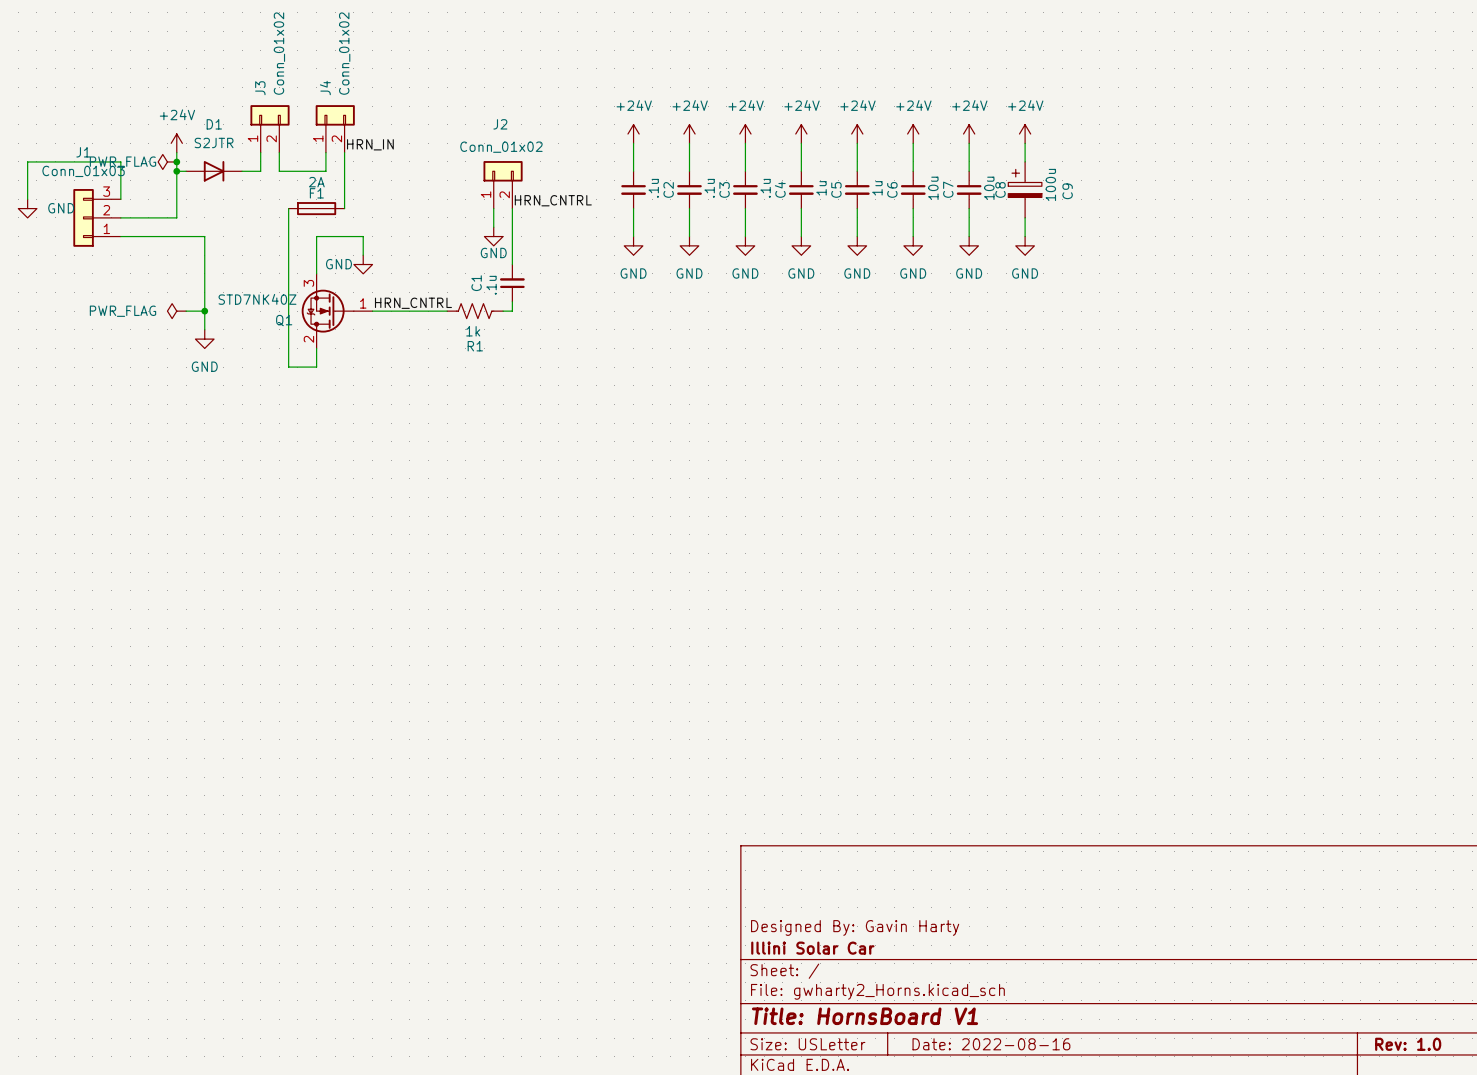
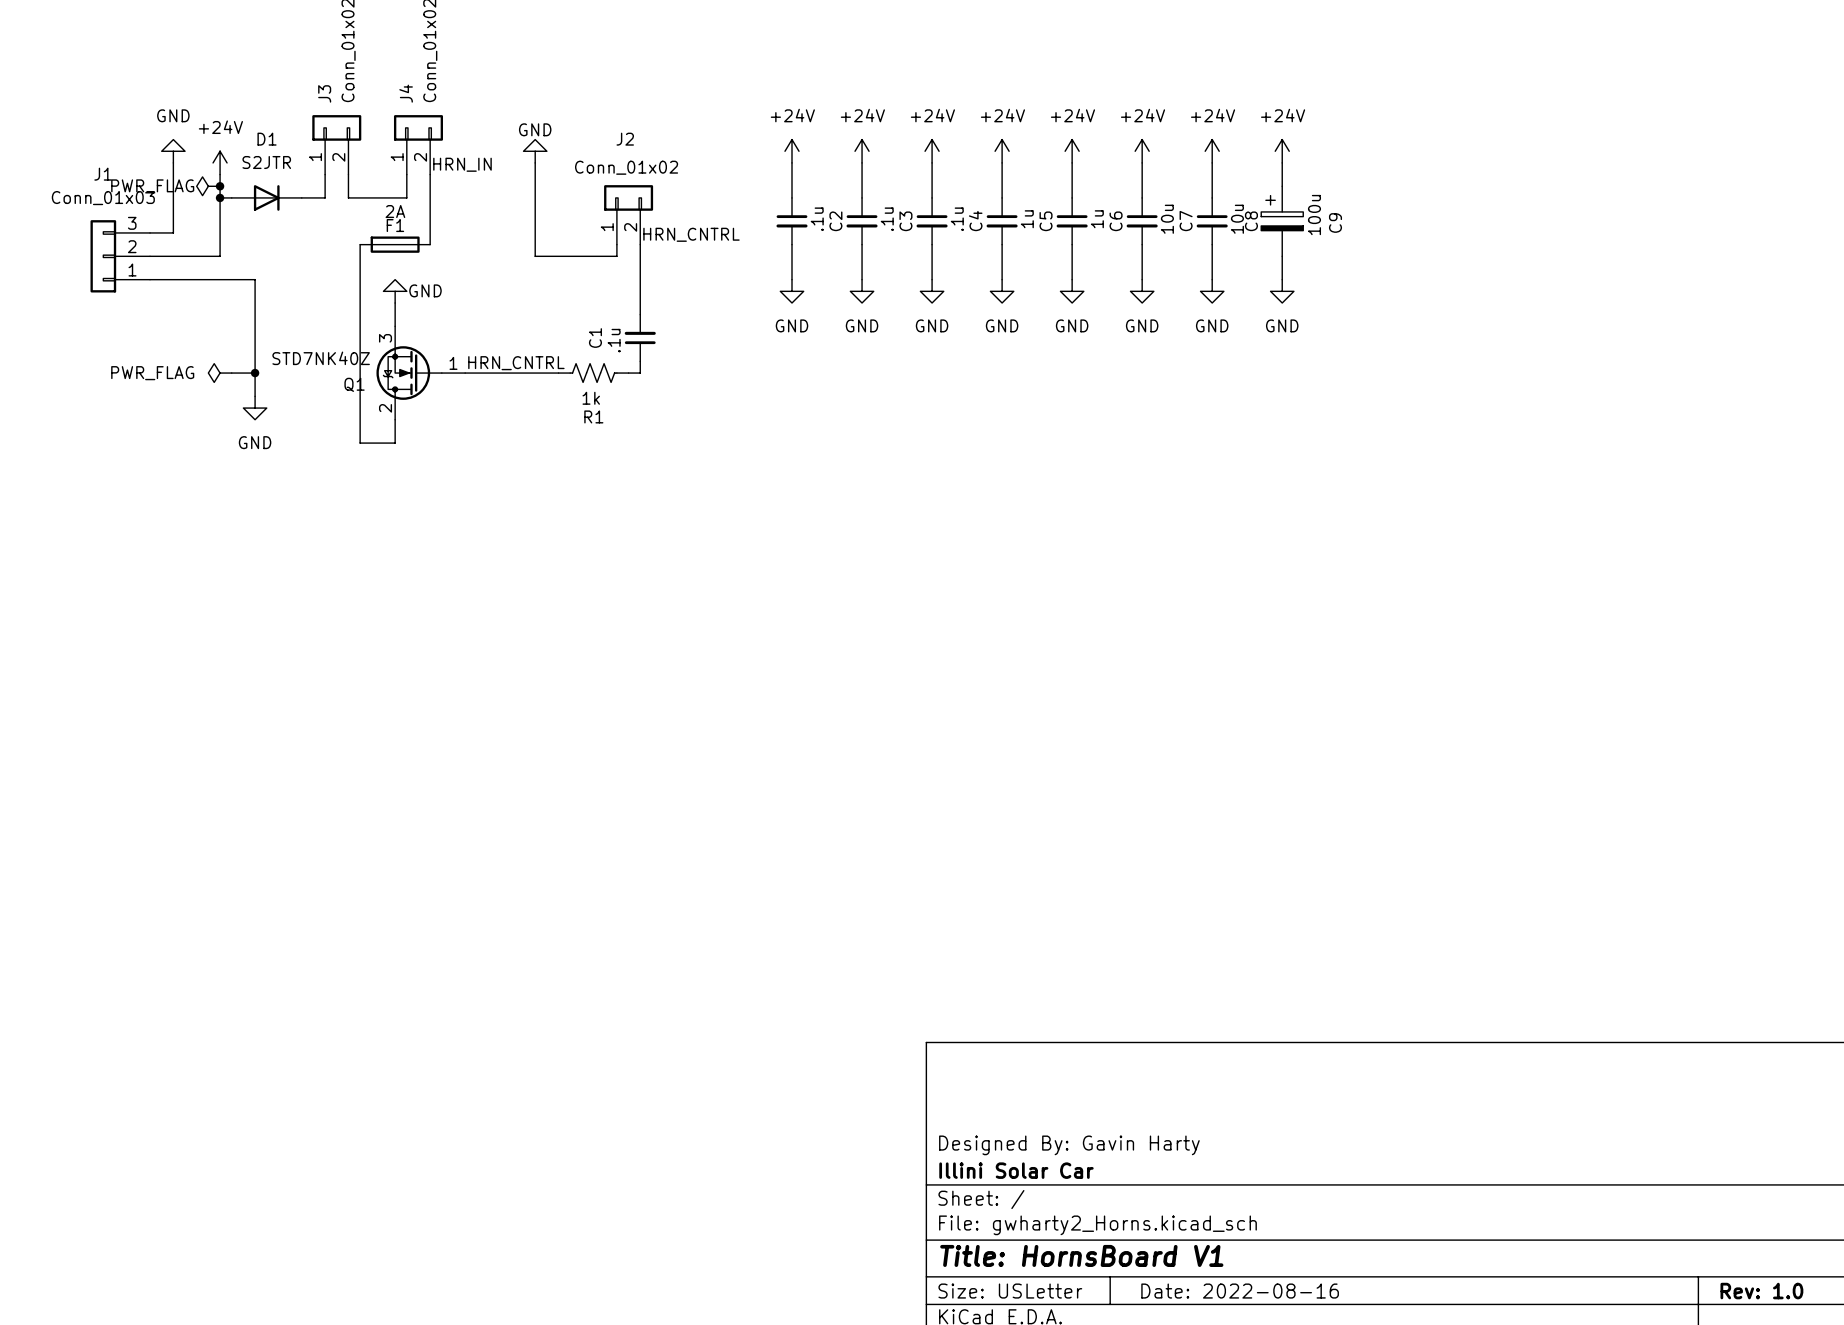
power symbol: none -> GND (173, 151)
power symbol: none -> GND (535, 151)
wire: (27, 199) (27, 161) (120, 161) (120, 199) -> (173, 162) (173, 232) (150, 232)
power symbol: GND (27, 208) -> none
wire: (493, 217) (493, 227) -> (616, 256) (535, 256) (535, 162)
power symbol: GND (493, 236) -> none
wire: (316, 255) (316, 236) (363, 236) (363, 255) -> none
power symbol rotation: 0° (363, 264) -> 180° (395, 291)
power symbol position: GND (363, 264) -> GND (395, 291)

